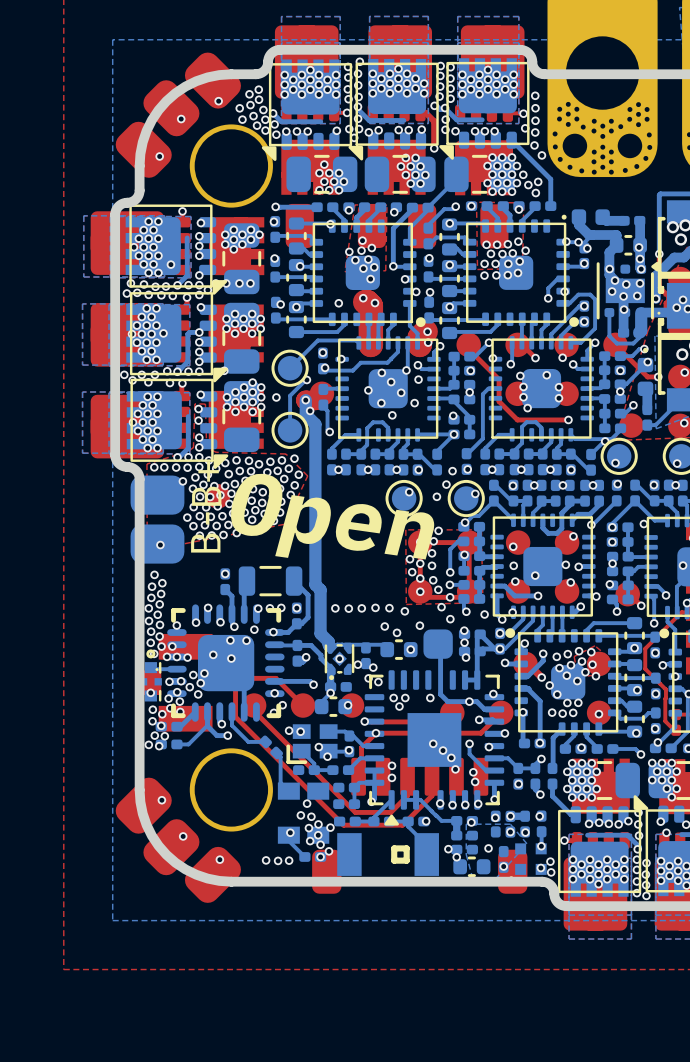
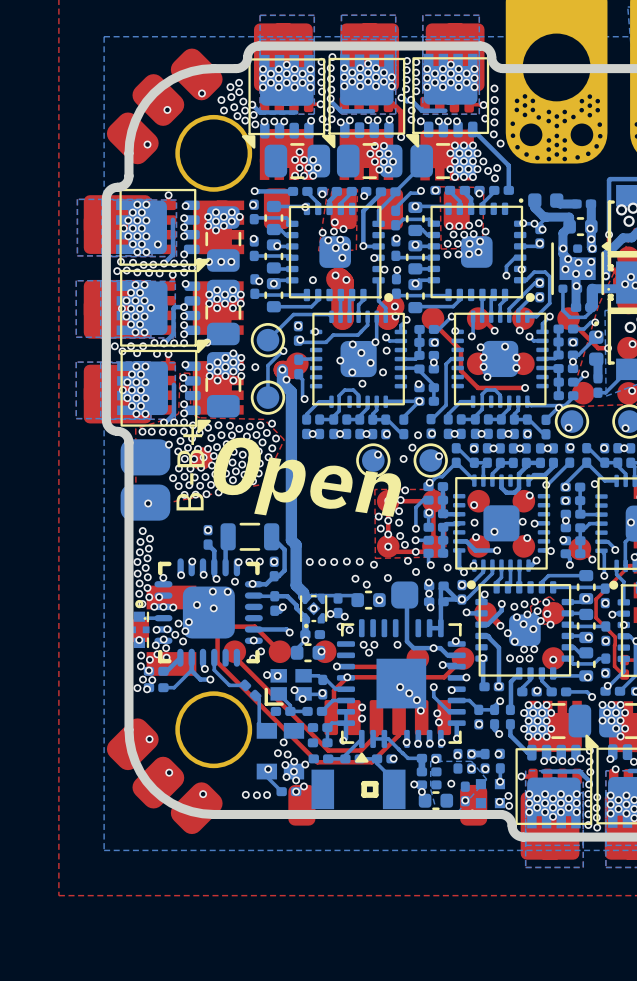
bottom track: (244, 685) (244, 712) -> none

